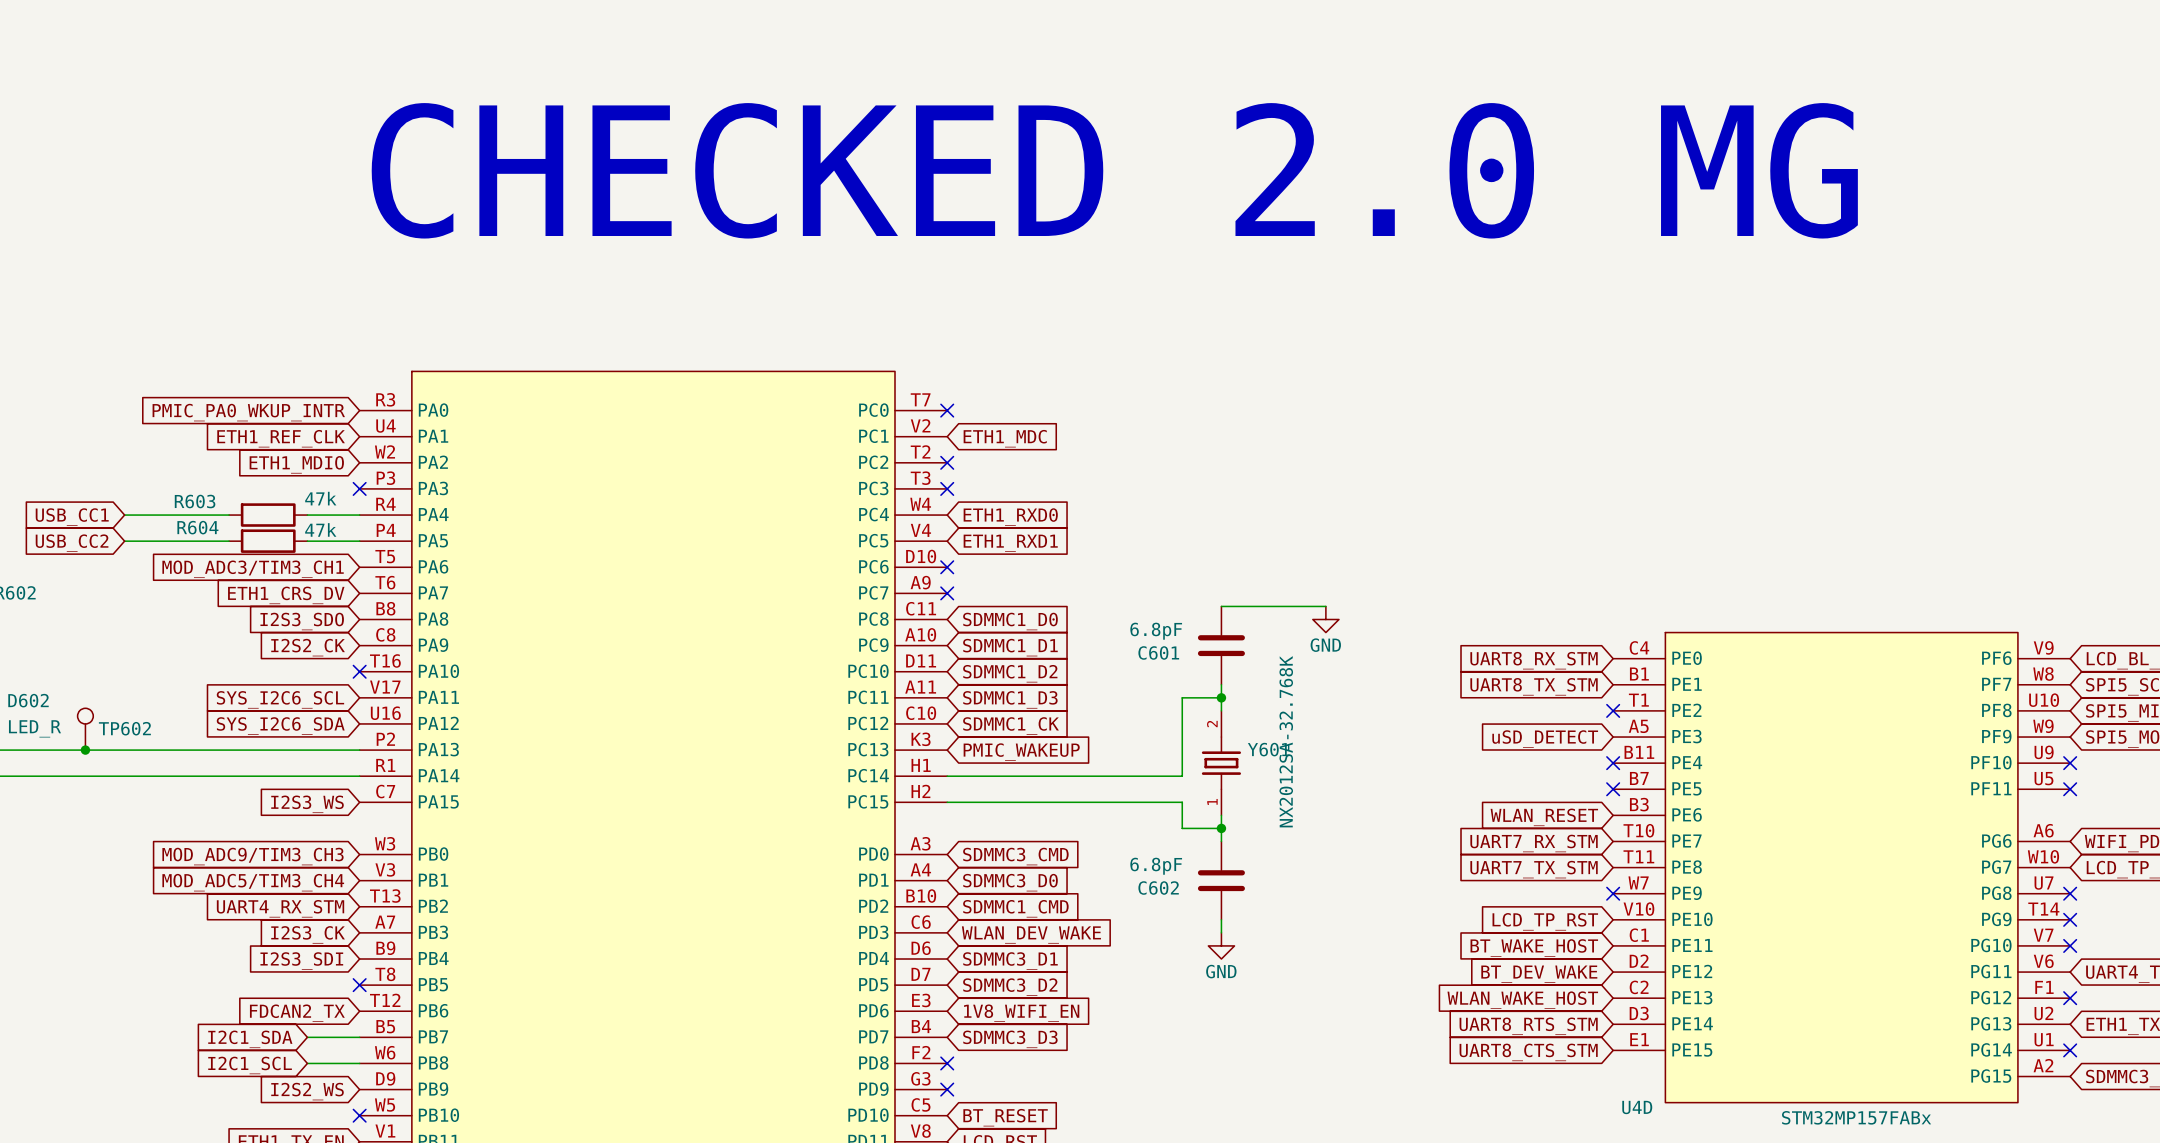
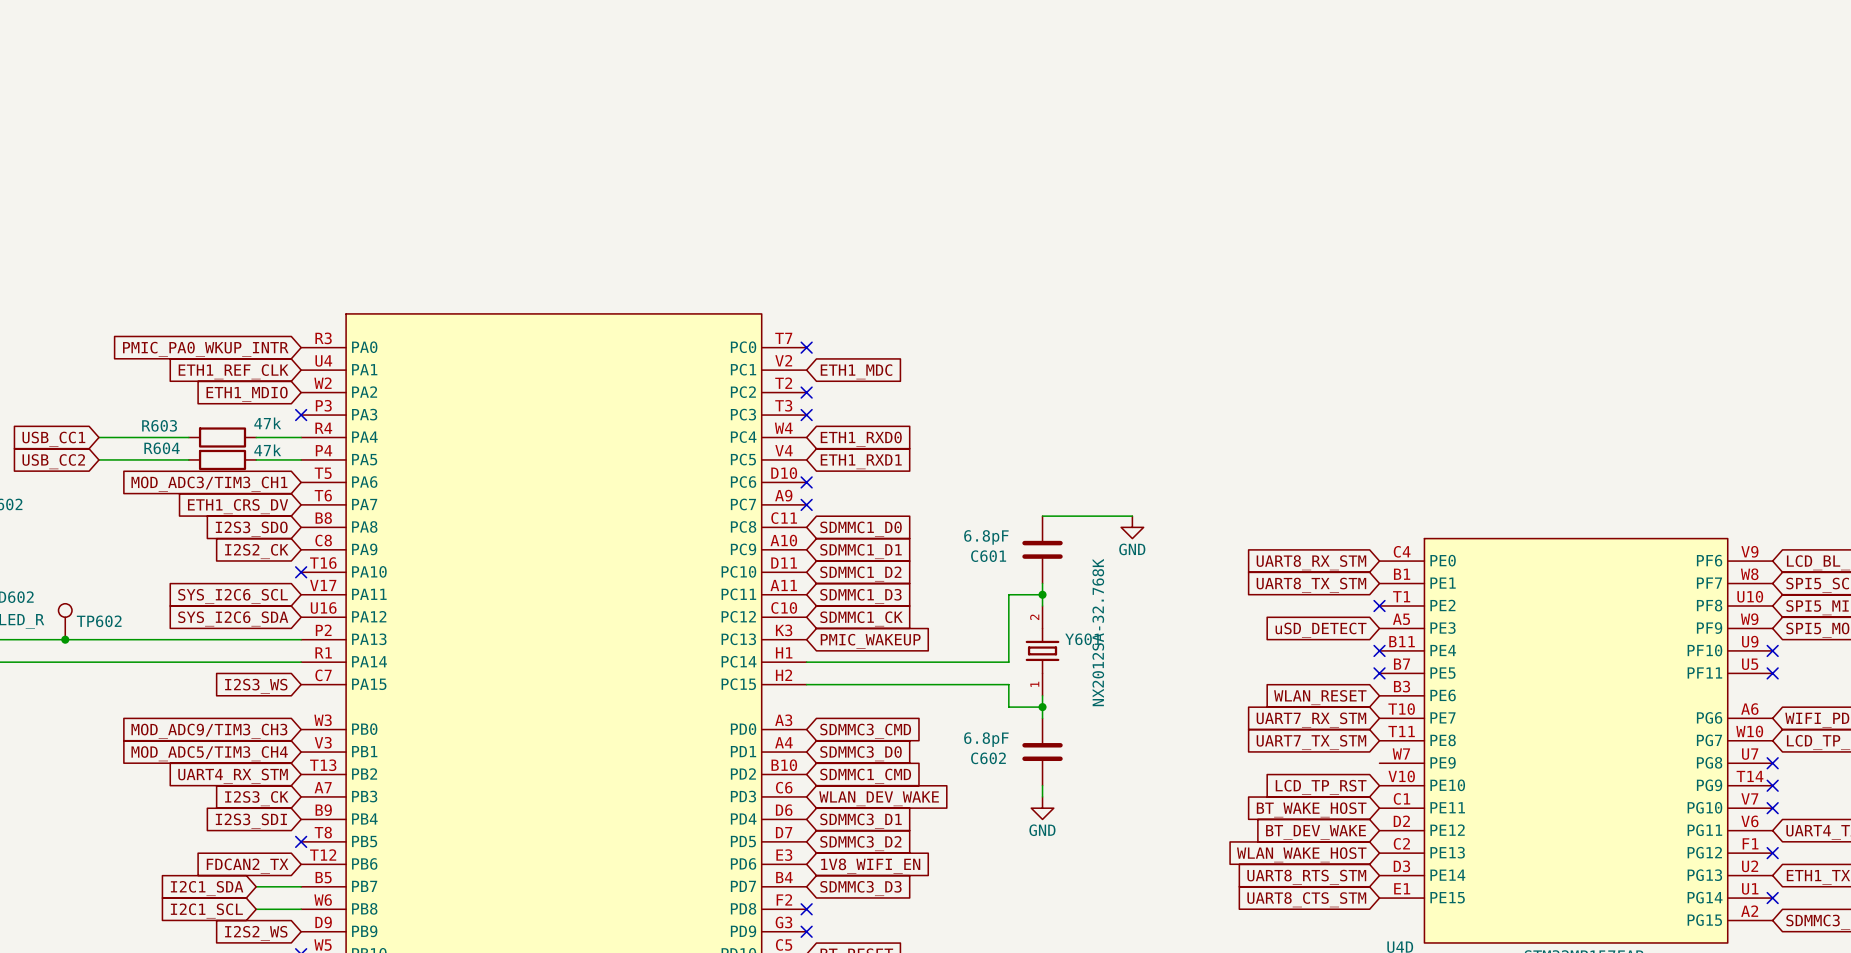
text: CHECKED 2.0 MG (1114, 170) -> none
no-connect mark: (1613, 893) -> none

